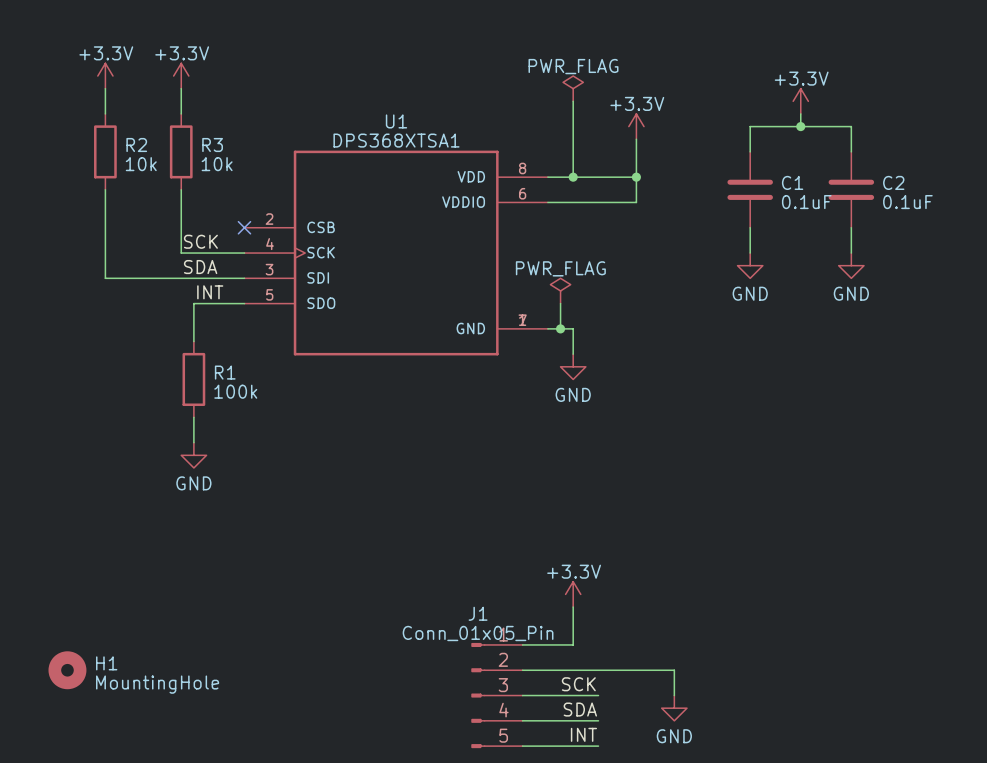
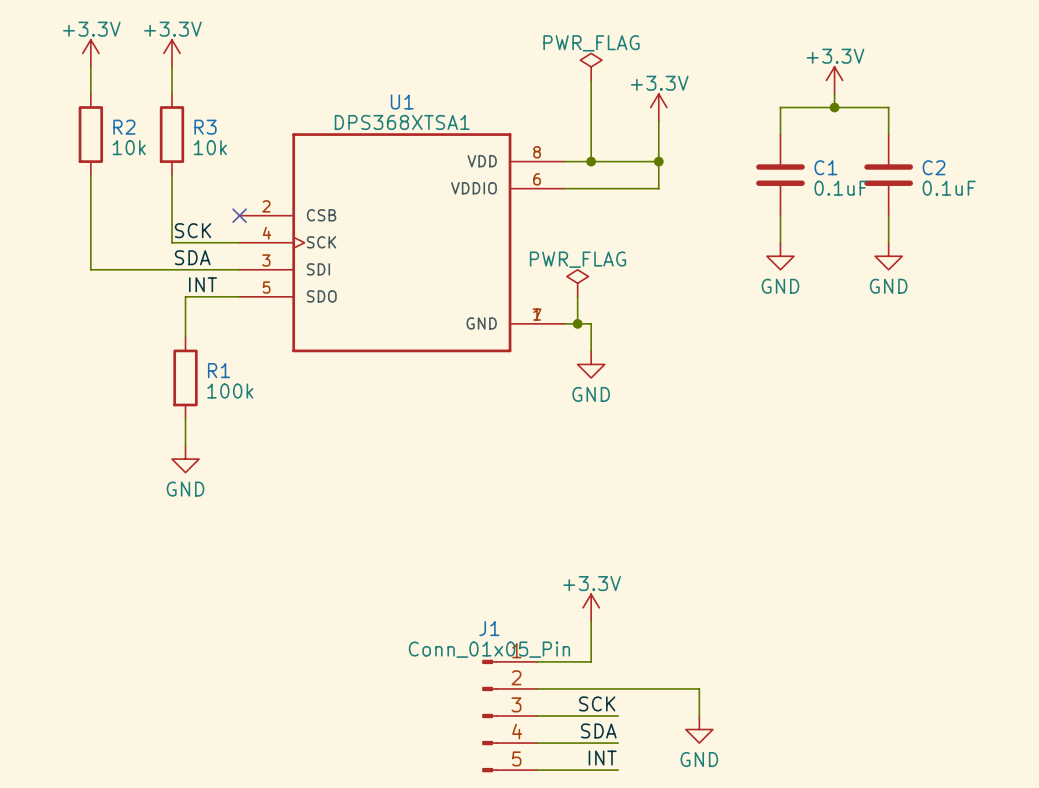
H1: MountingHole (67, 670) -> none

